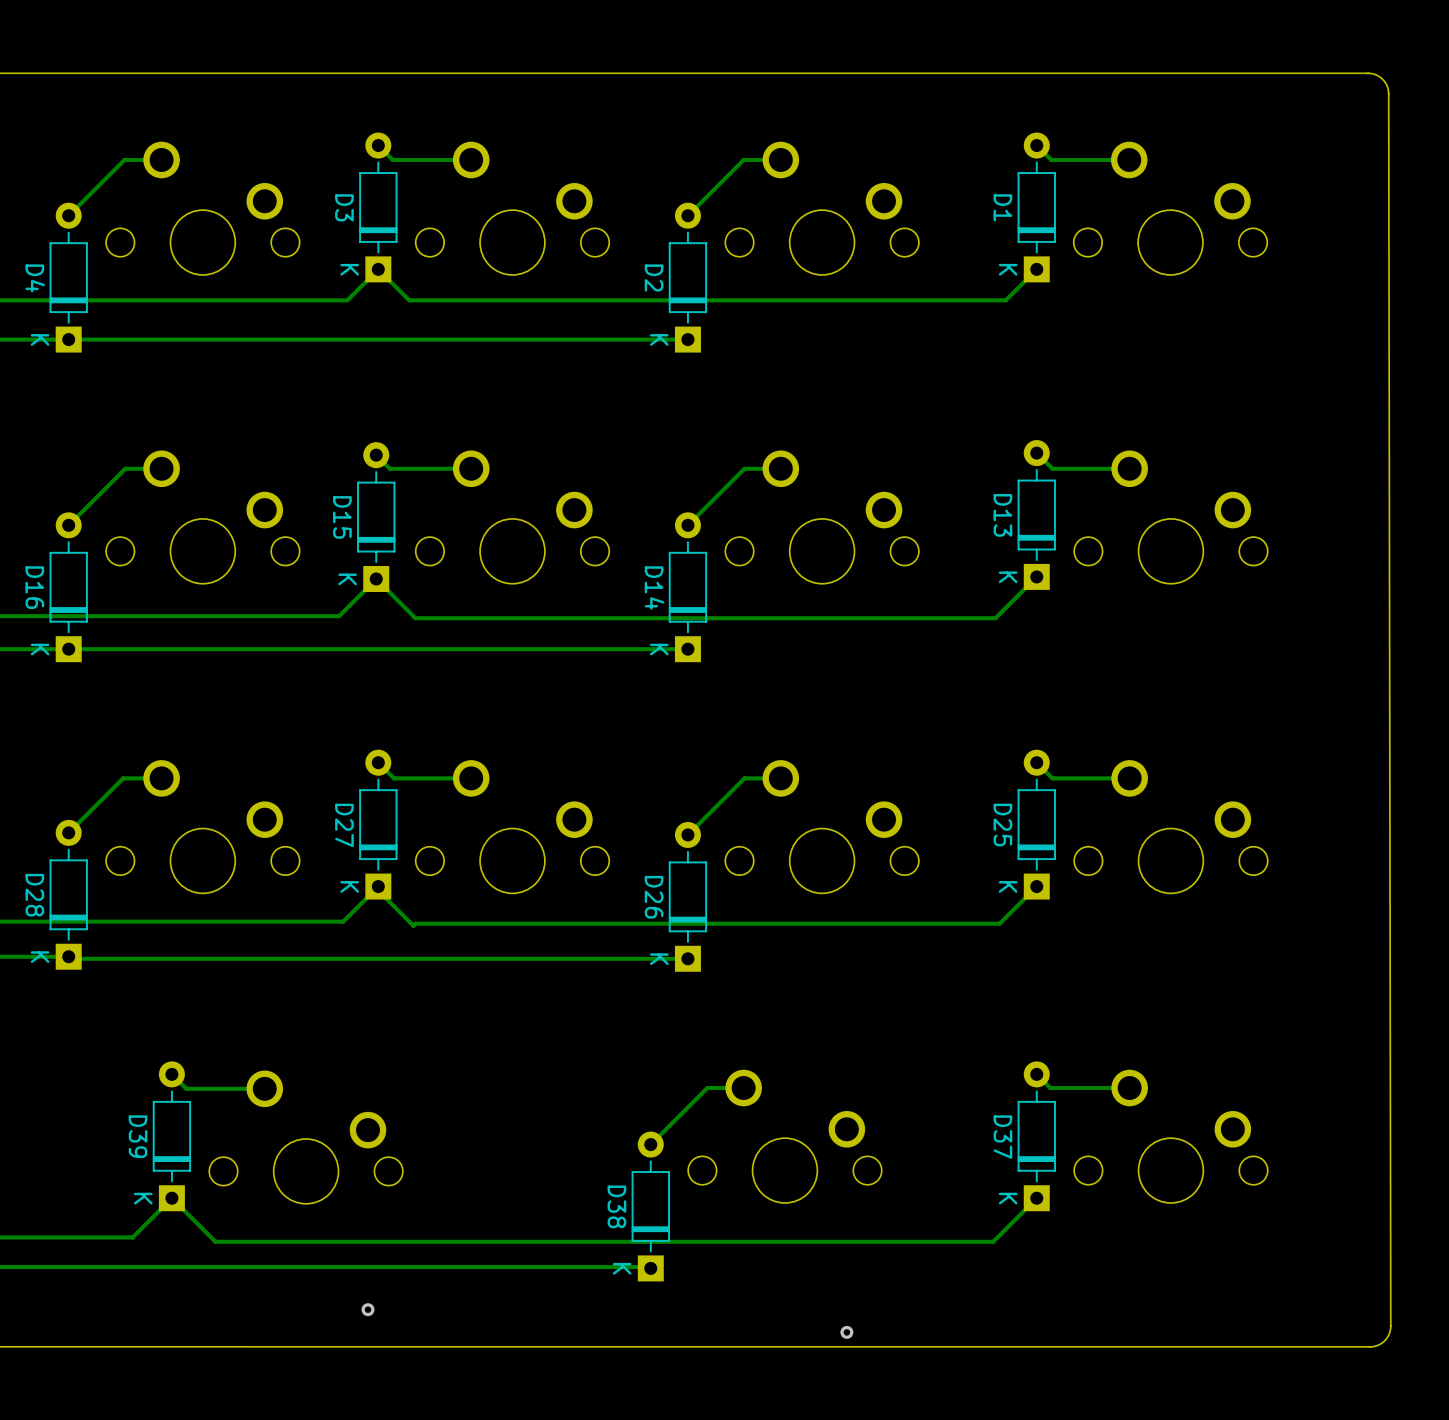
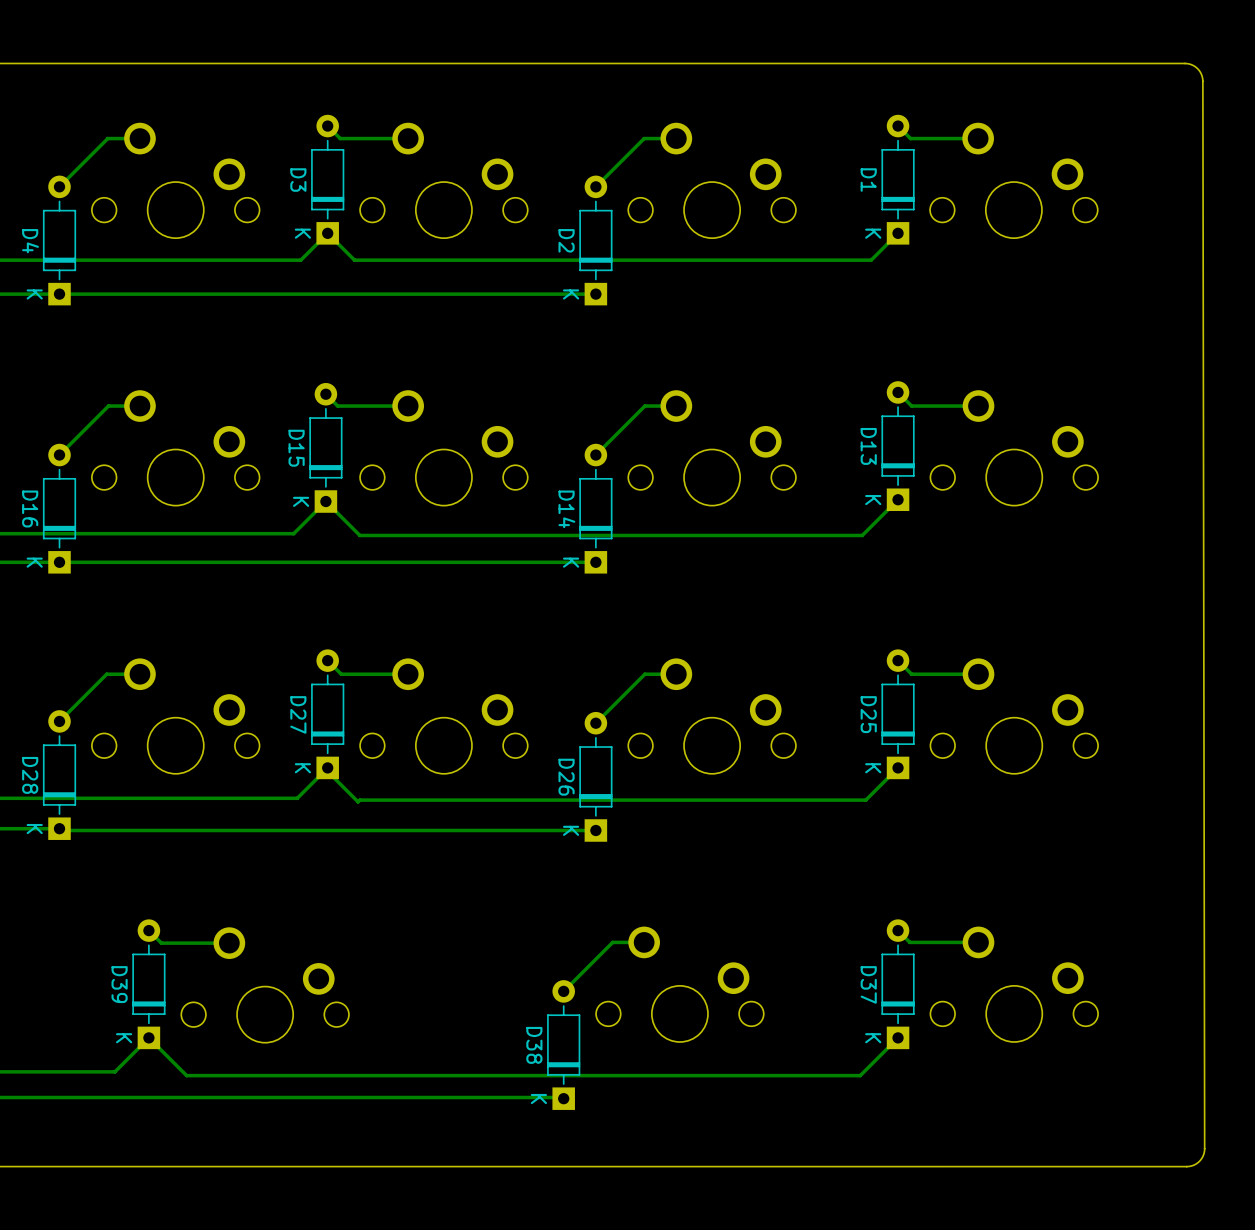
via: (368, 1309) -> none
via: (846, 1332) -> none

